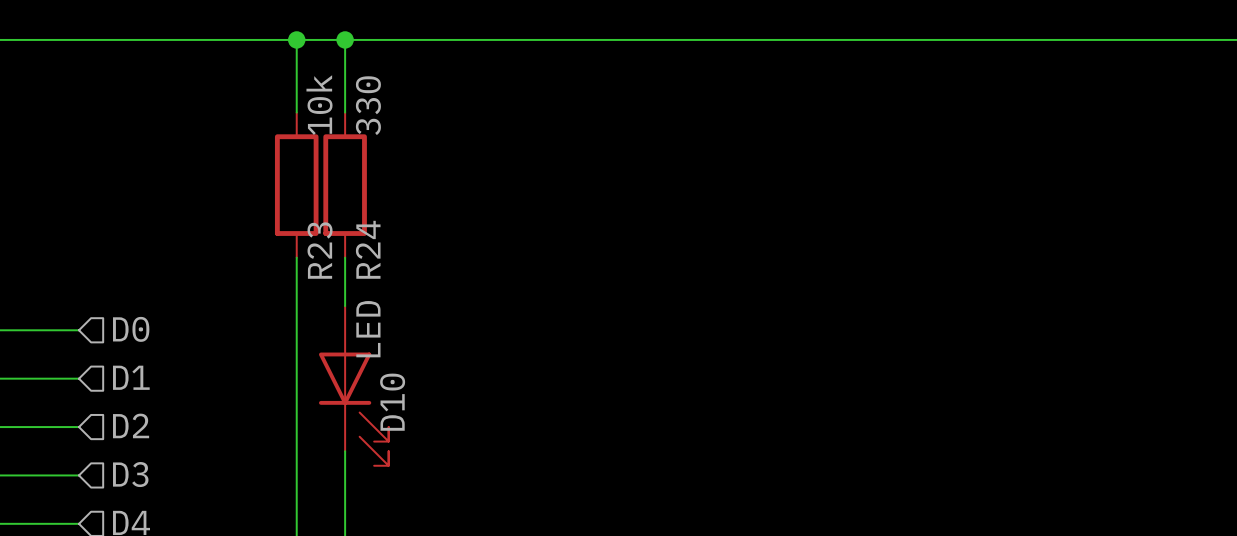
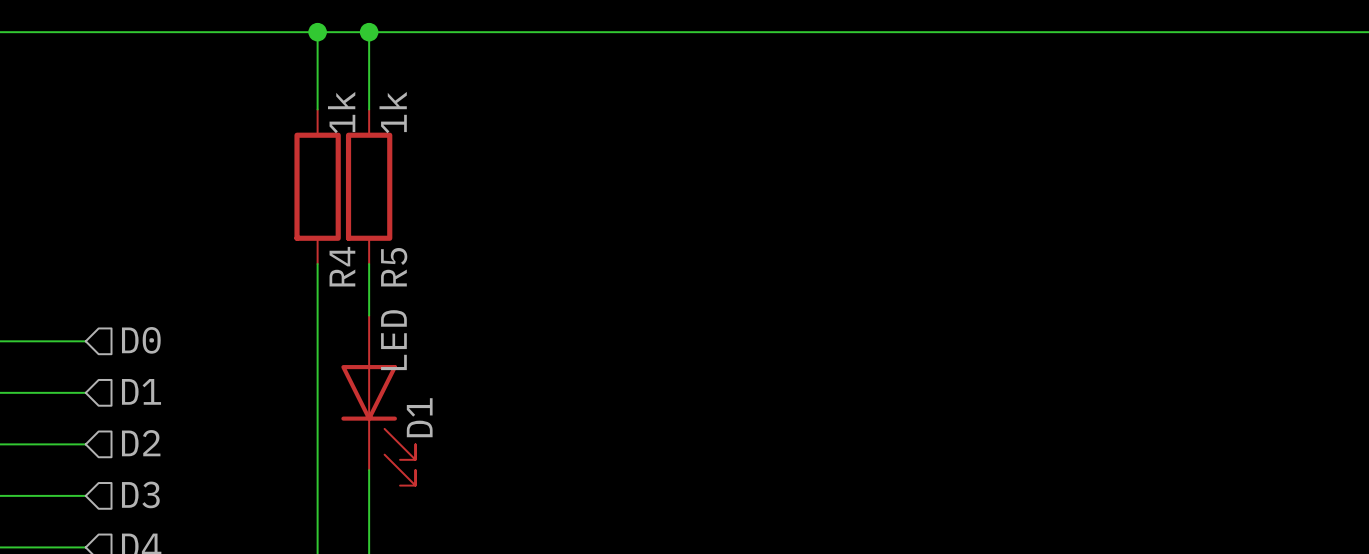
R23 value: 10k (319, 105) -> 1k (341, 112)
R24 value: 330 (368, 105) -> 1k (393, 112)
R24 name: R24 (368, 249) -> R5 (394, 267)
R23 name: R23 (320, 250) -> R4 (342, 266)
D10 name: D10 (392, 402) -> D1 (419, 417)

